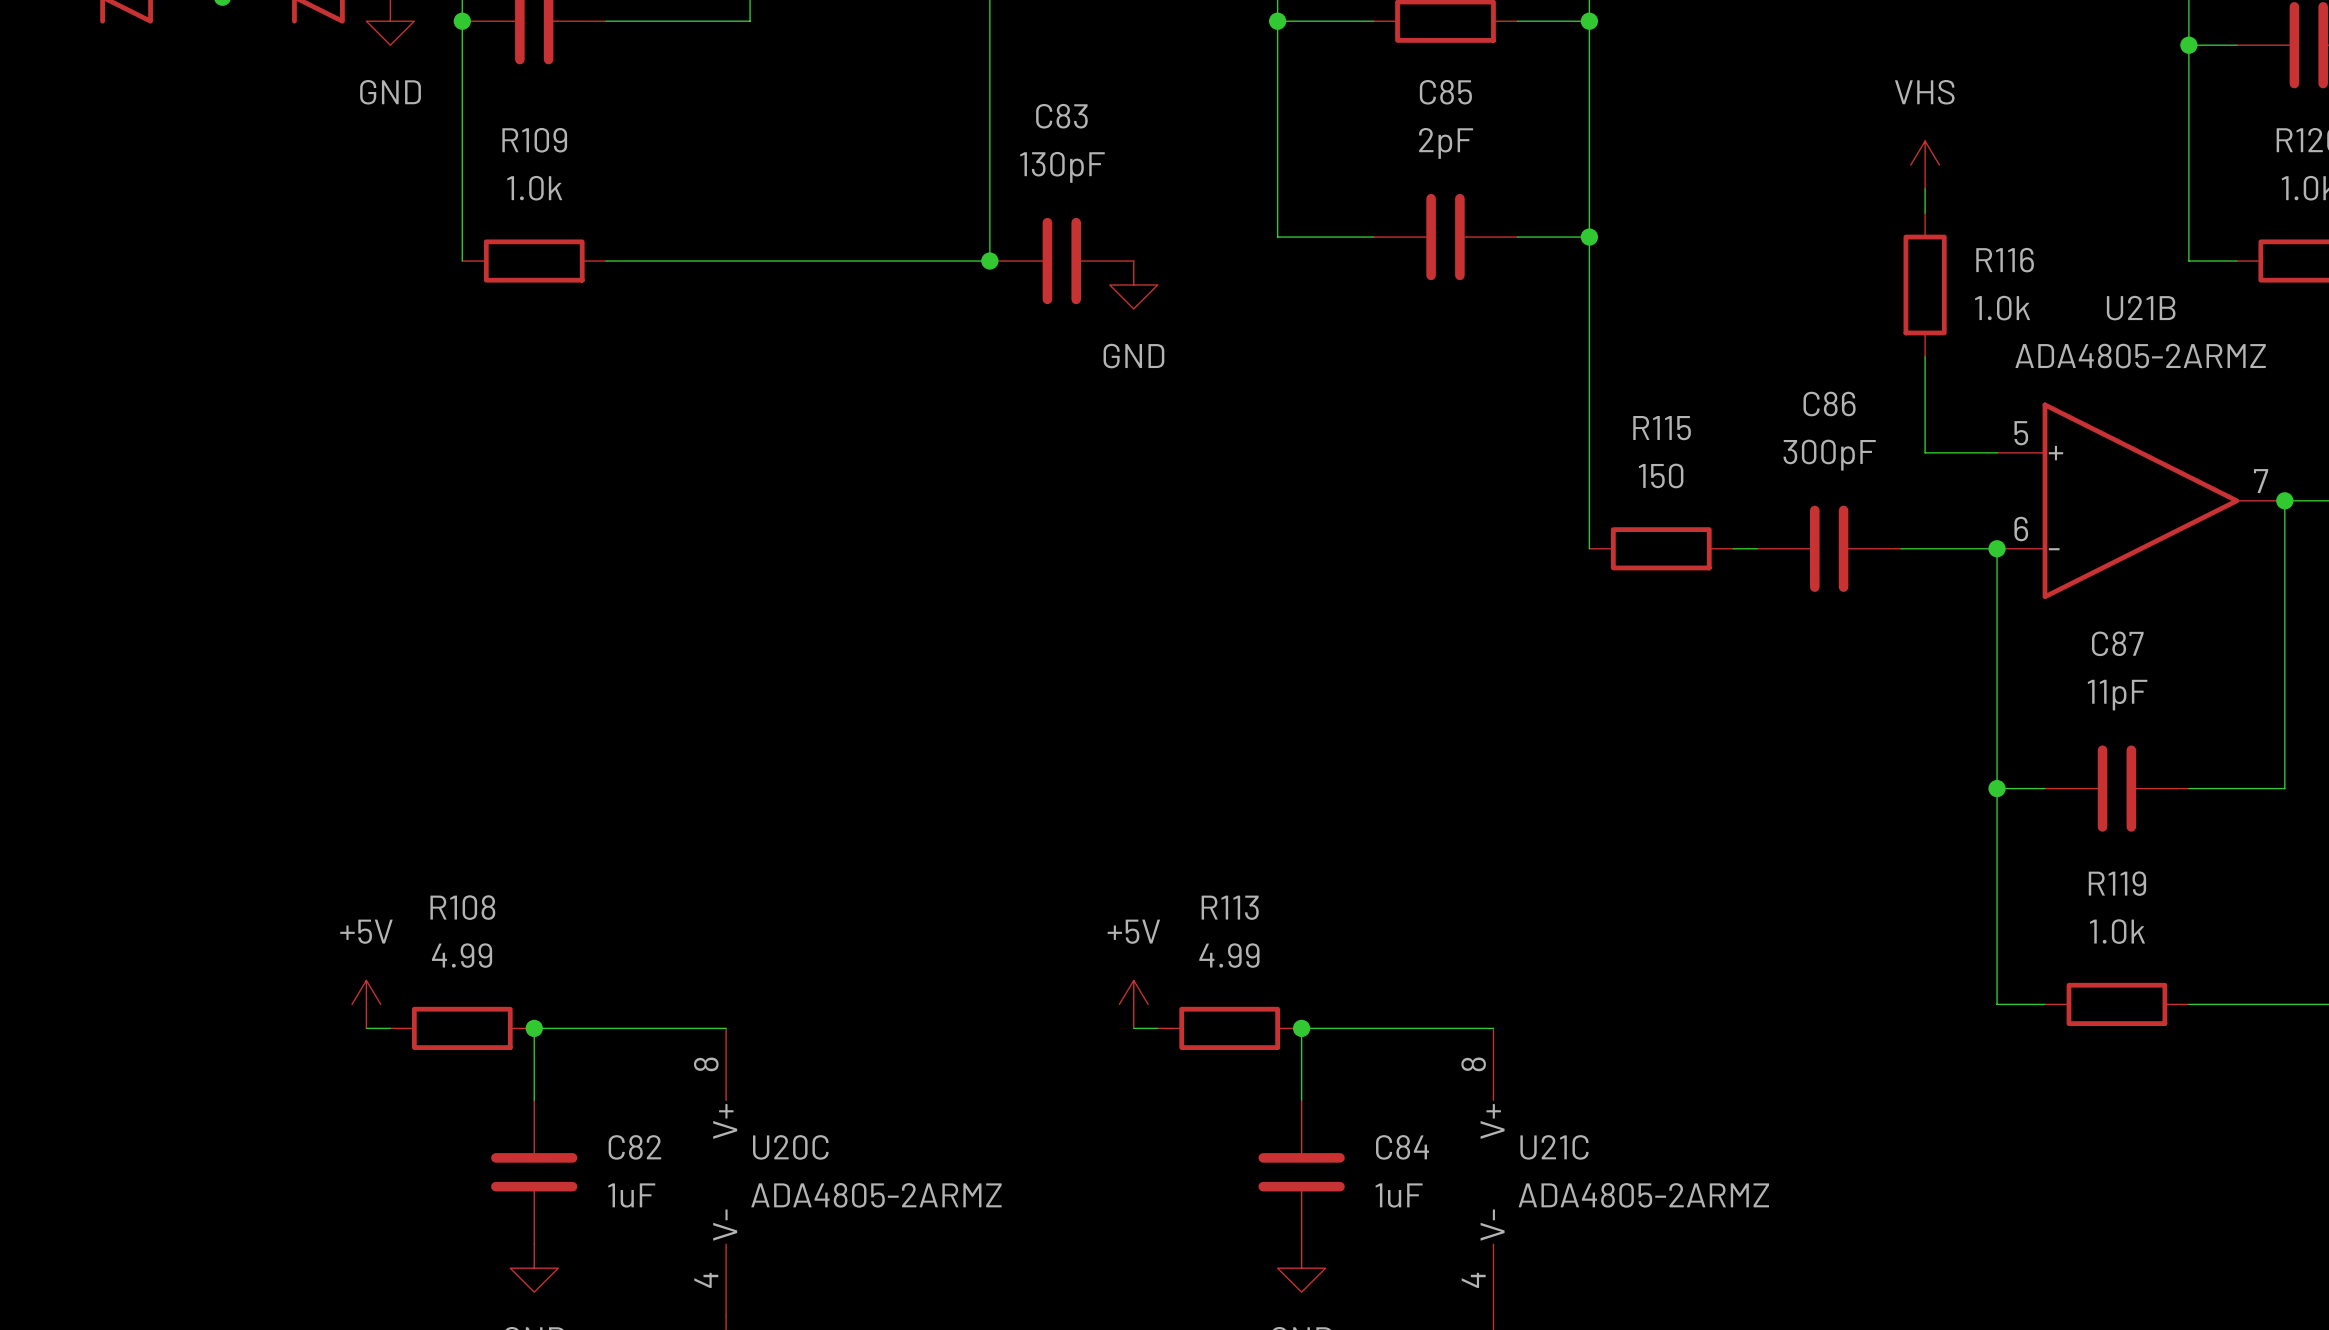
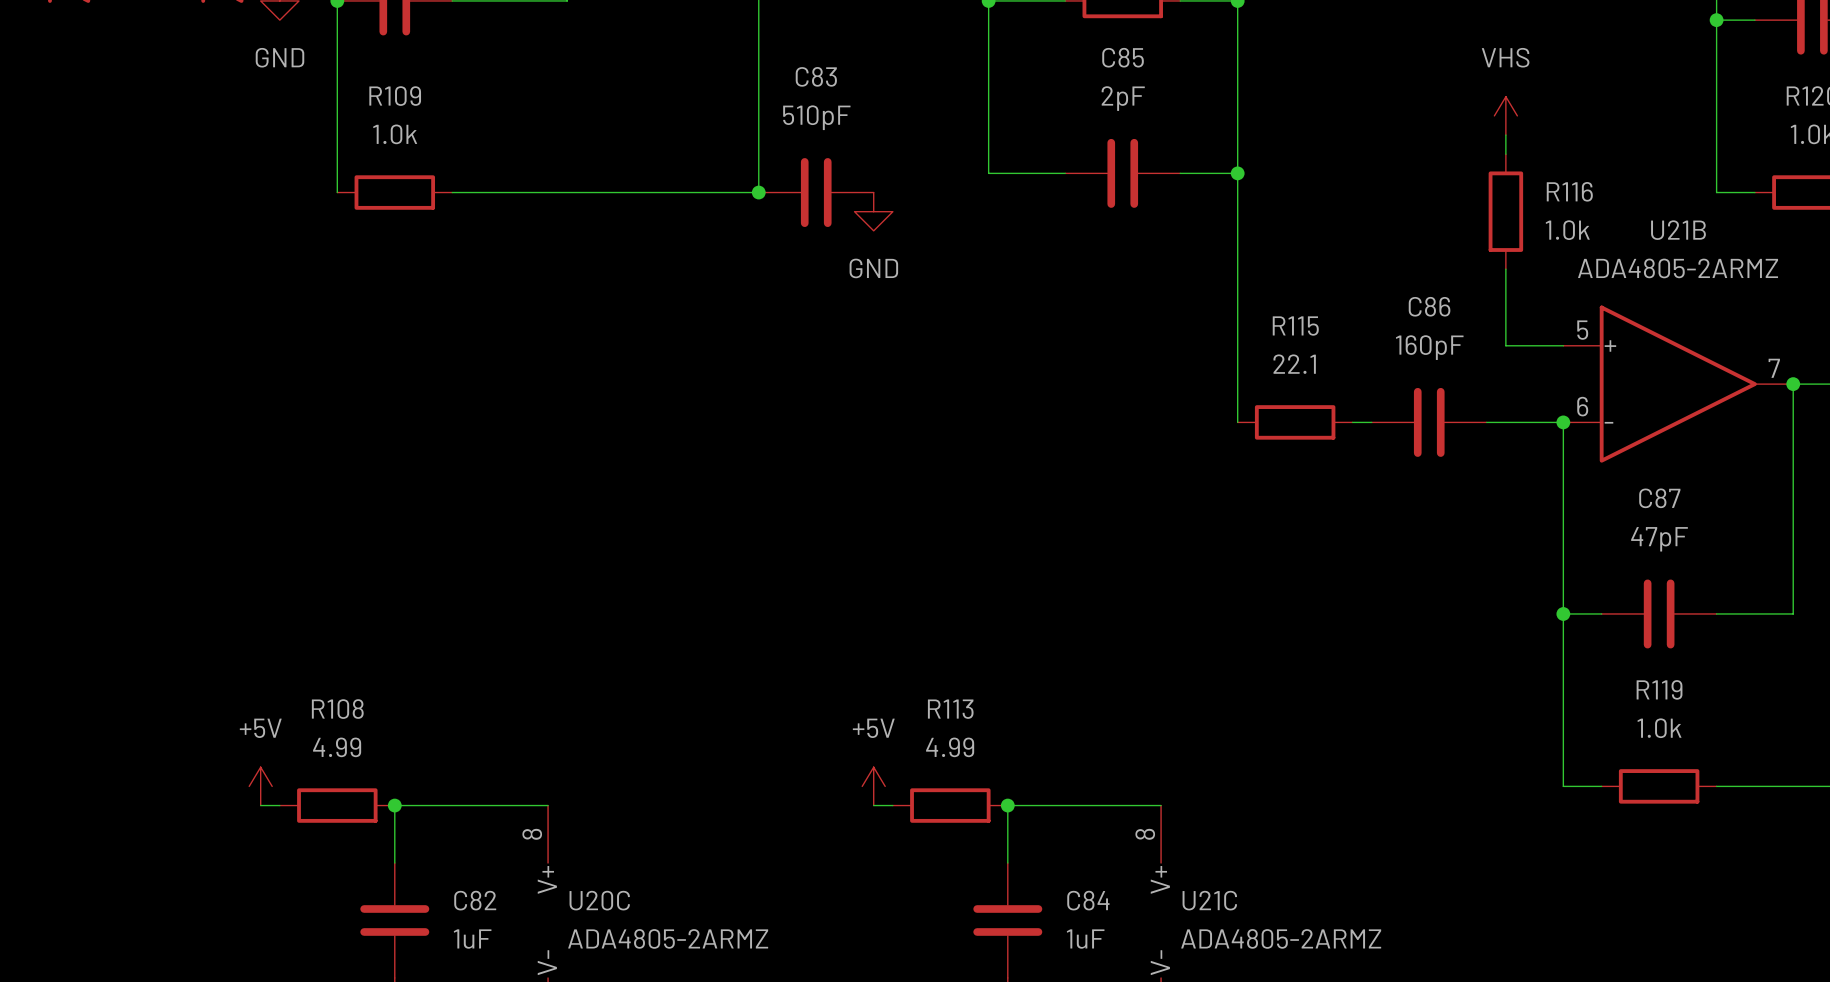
C83 value: 130pF (1062, 167) -> 510pF (816, 117)
C86 value: 300pF (1829, 455) -> 160pF (1429, 347)
R115 value: 150 (1661, 475) -> 22.1 (1294, 364)
C87 value: 11pF (2117, 695) -> 47pF (1659, 539)

